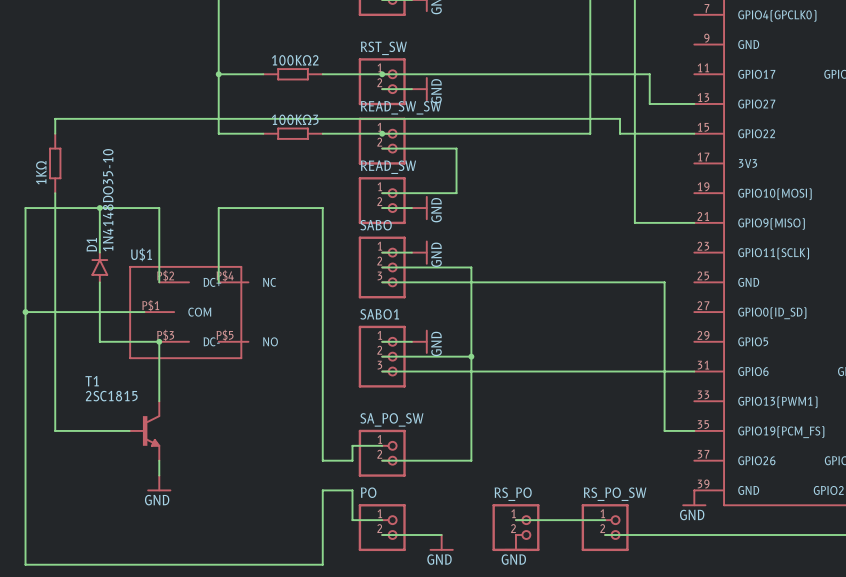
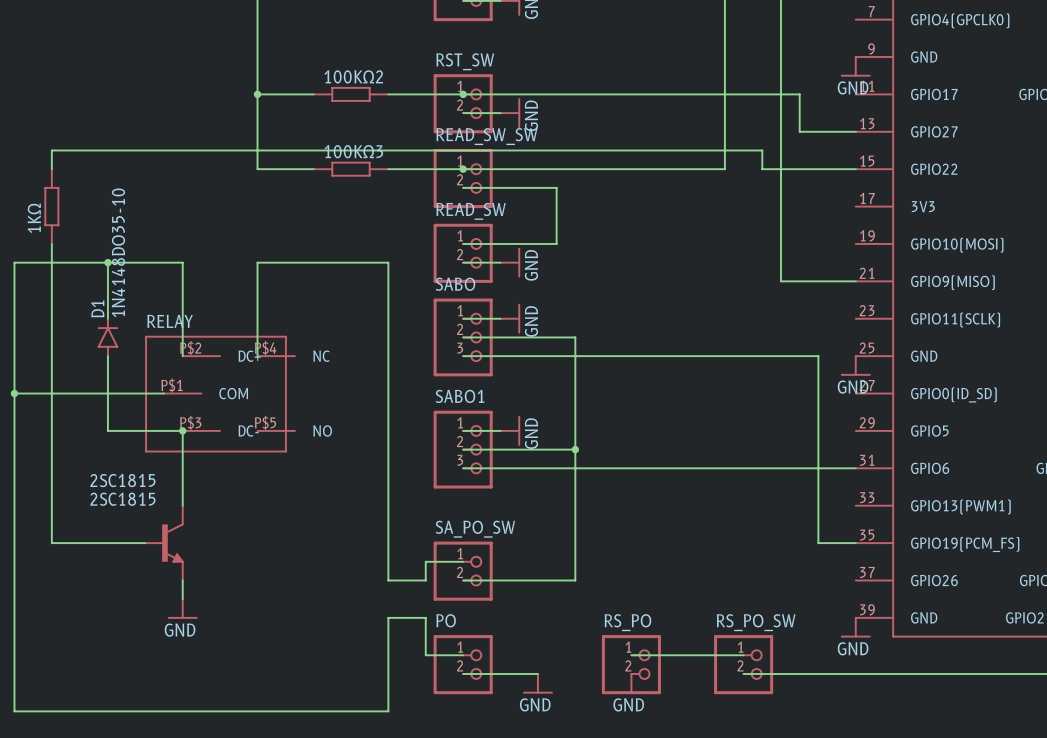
power symbol: none -> GND (855, 66)
U$1 name: U$1 (141, 254) -> RELAY (170, 321)
power symbol: none -> GND (855, 365)
T1 name: T1 (92, 381) -> 2SC1815 (122, 480)

